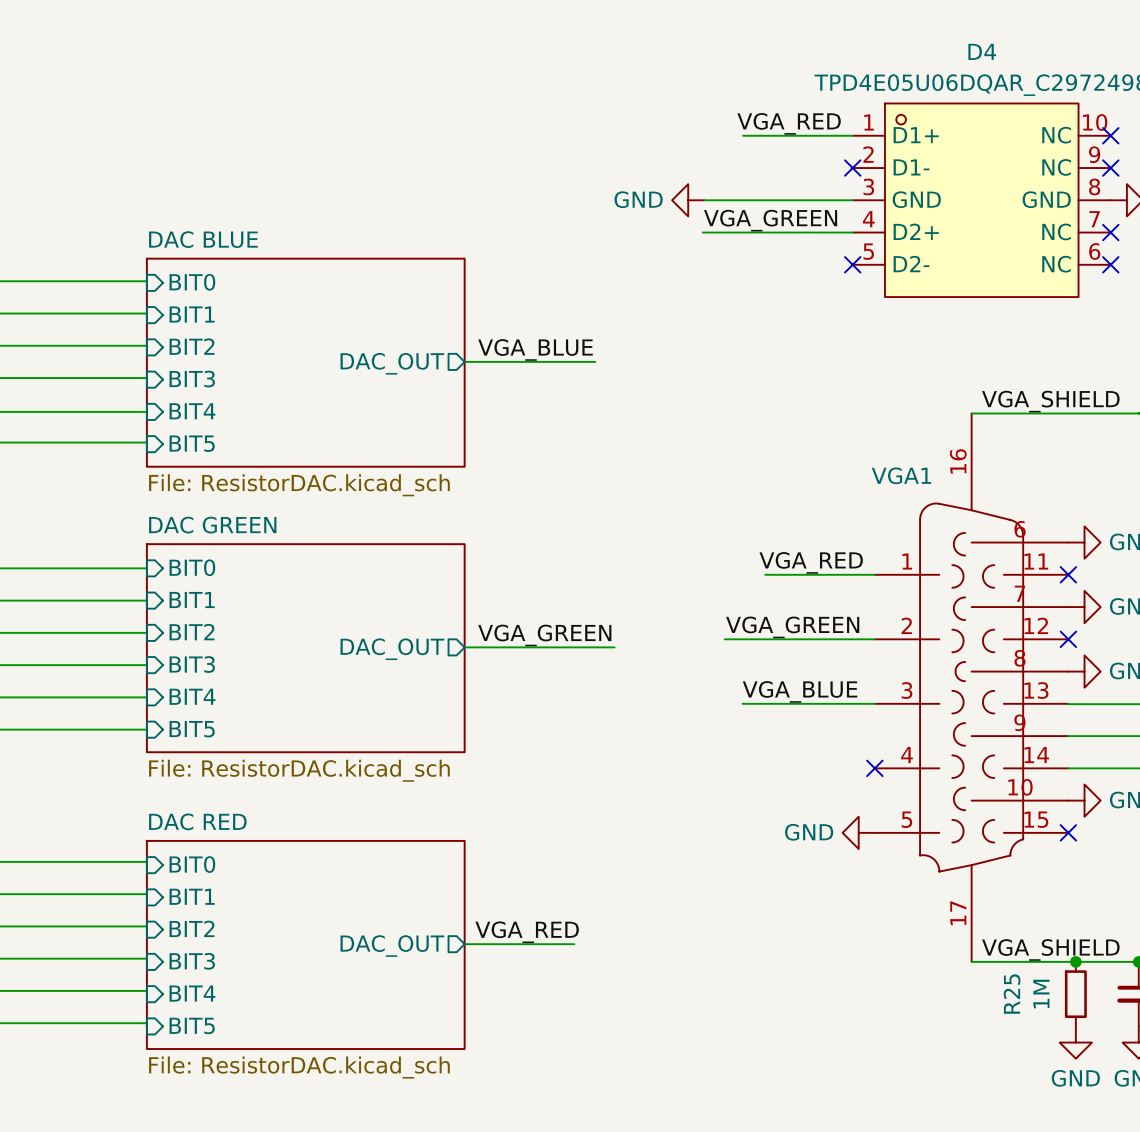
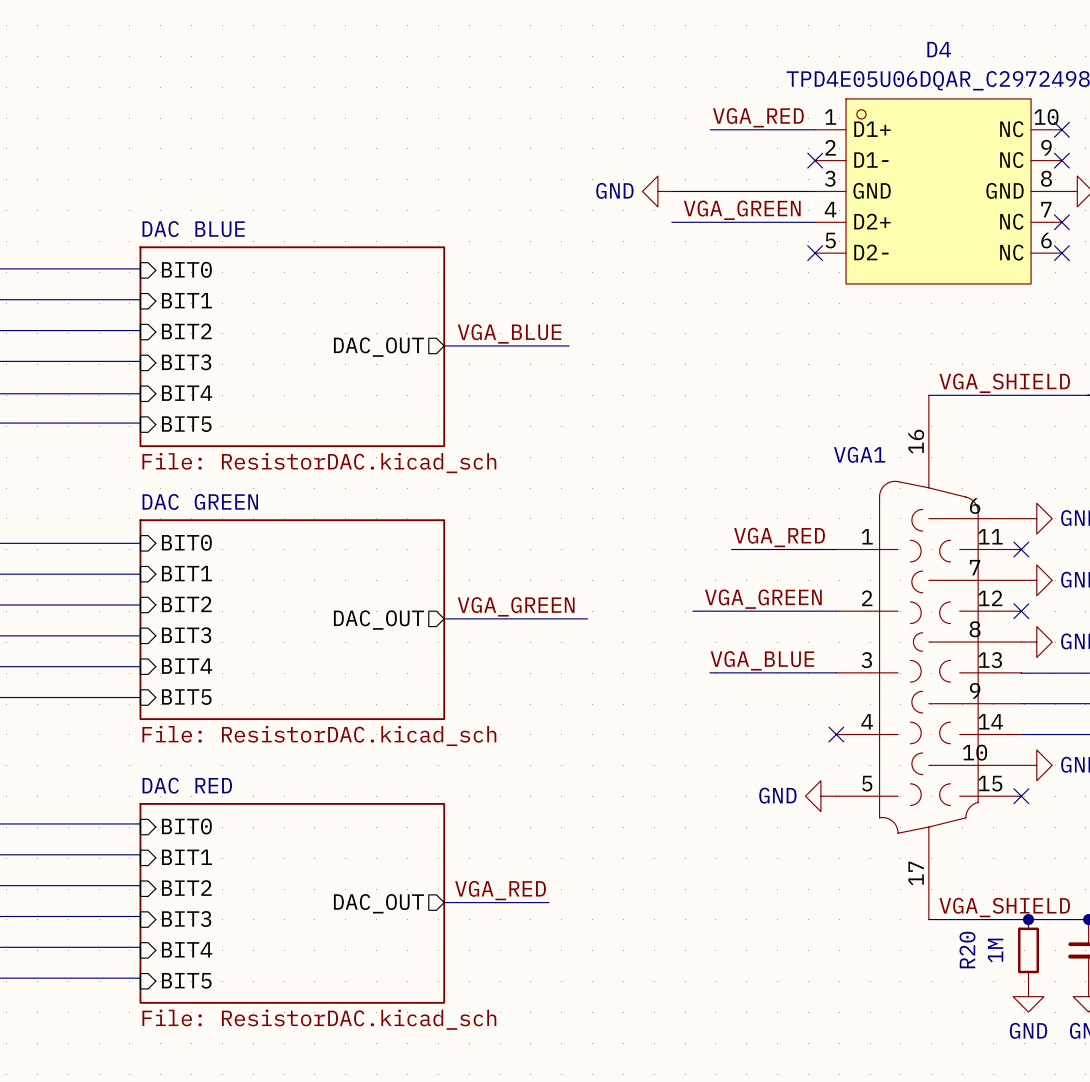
R25 name: R25 (1012, 994) -> R20 (967, 950)

